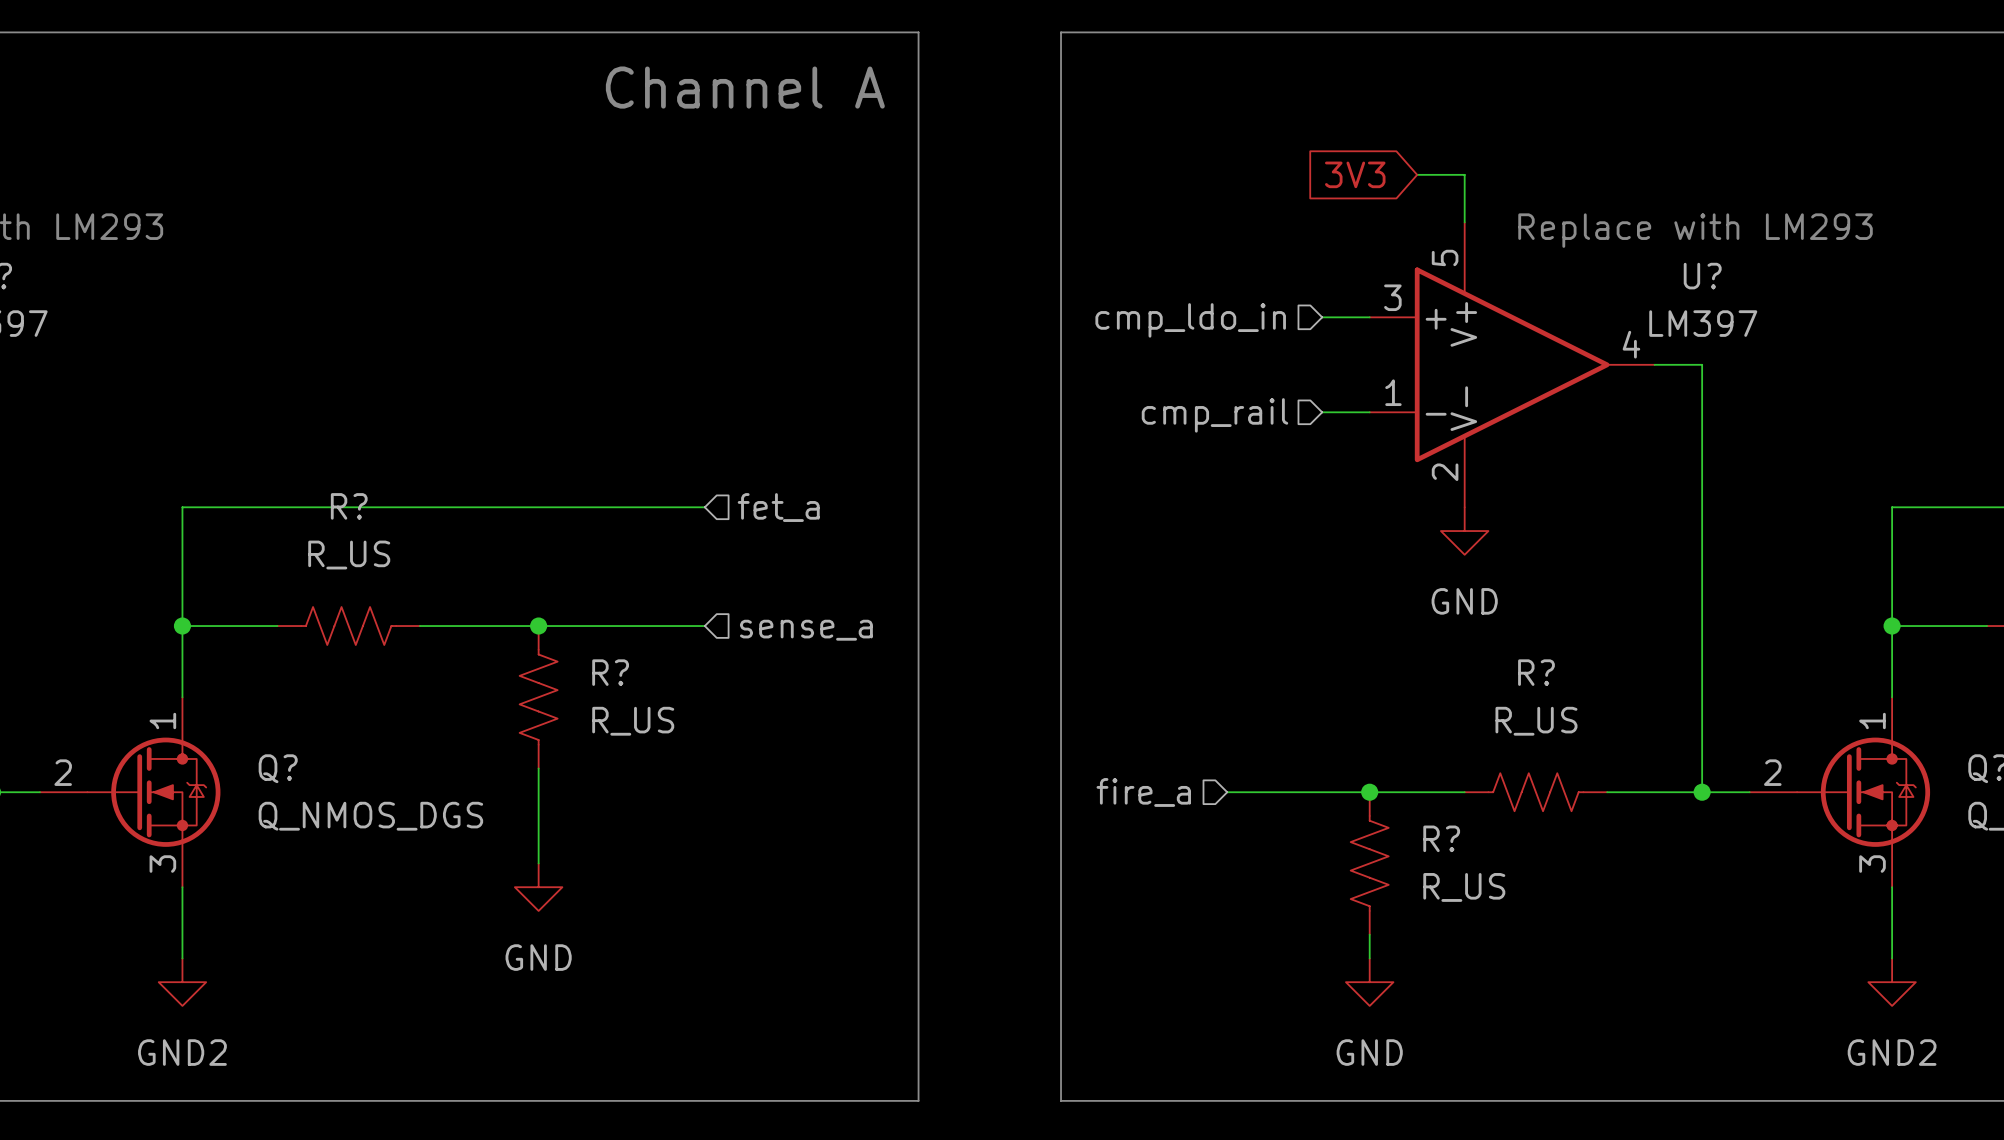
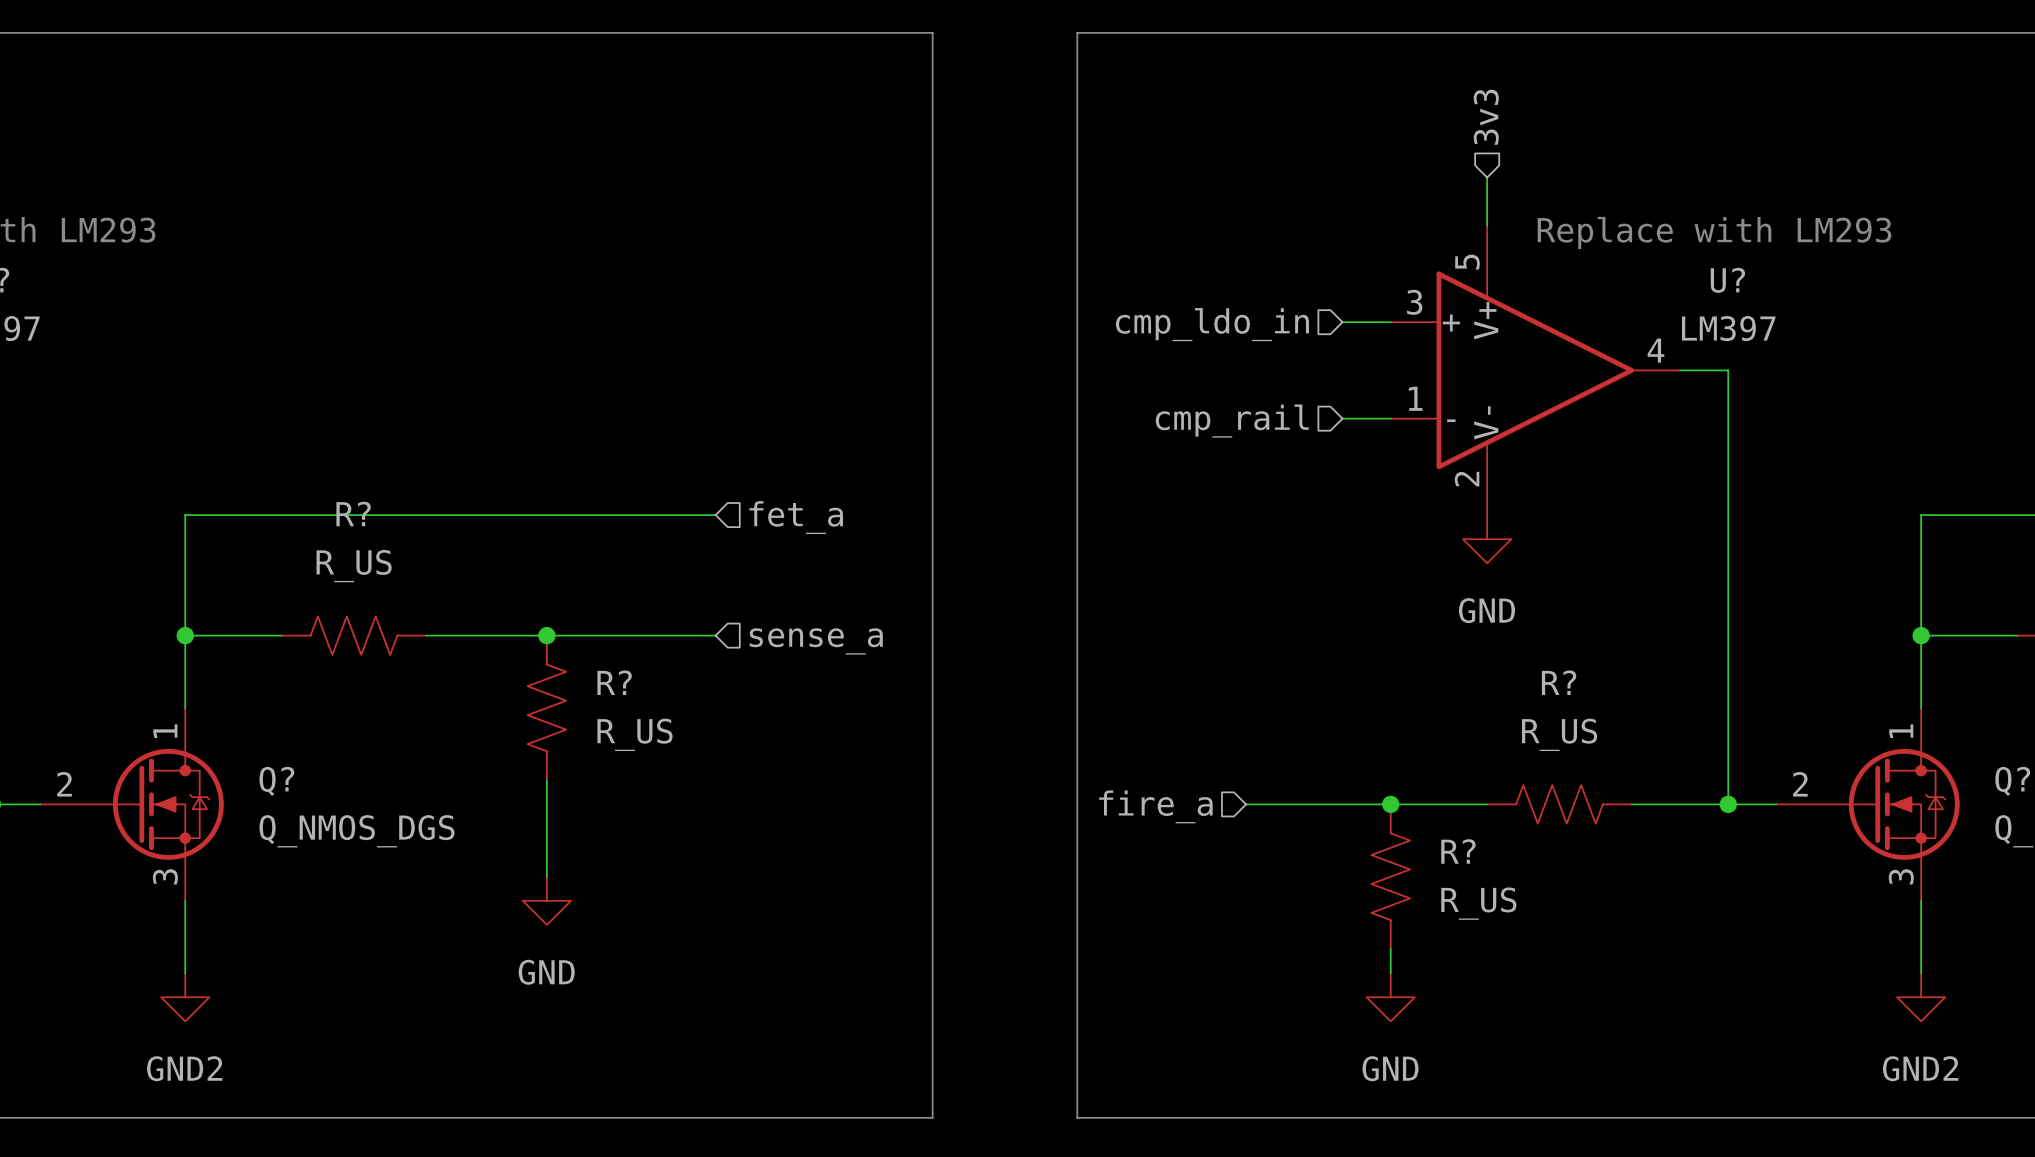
text: Channel A (745, 87) -> none
hierarchical label: none -> 3v3 (1486, 117)
global label: 3V3 (1355, 174) -> none
wire: (1417, 174) (1464, 174) -> none

